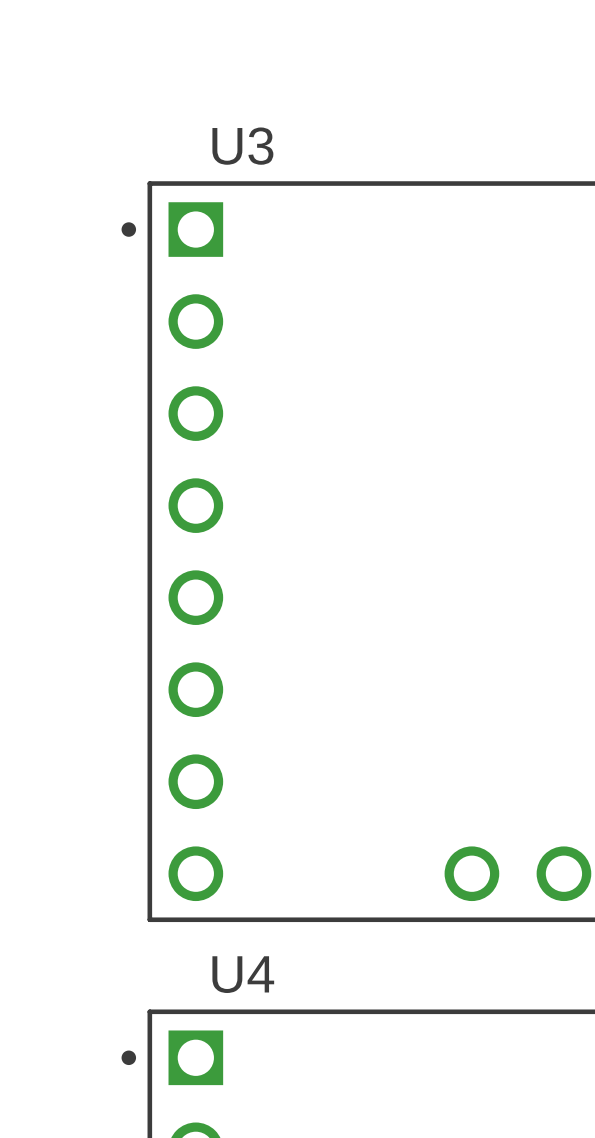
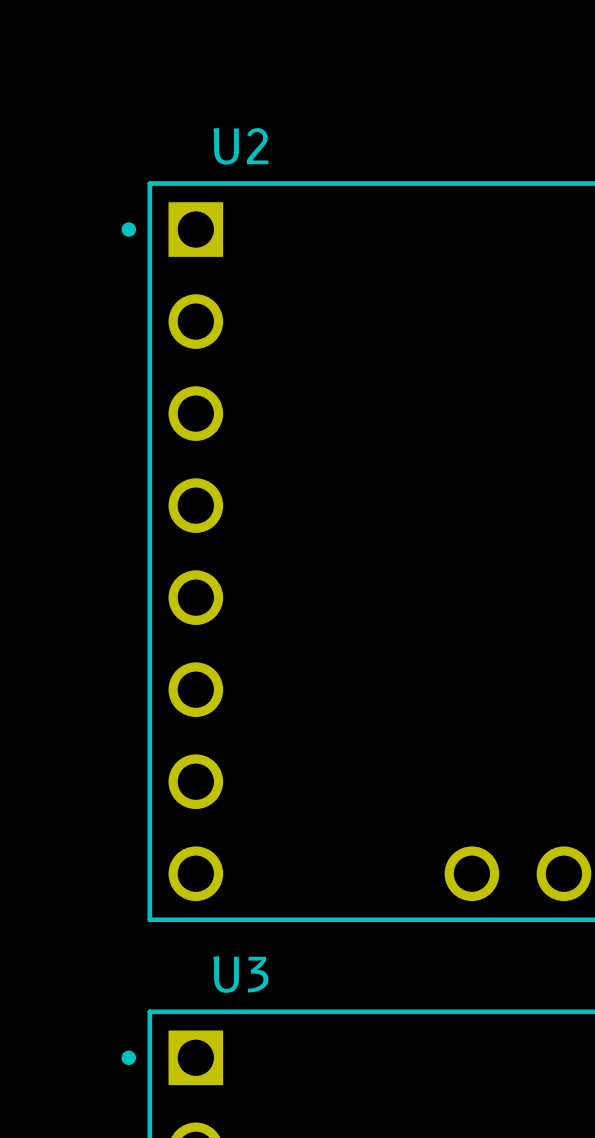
U3 name: U3 (242, 146) -> U2 (240, 146)
U4 name: U4 (243, 974) -> U3 (240, 974)

